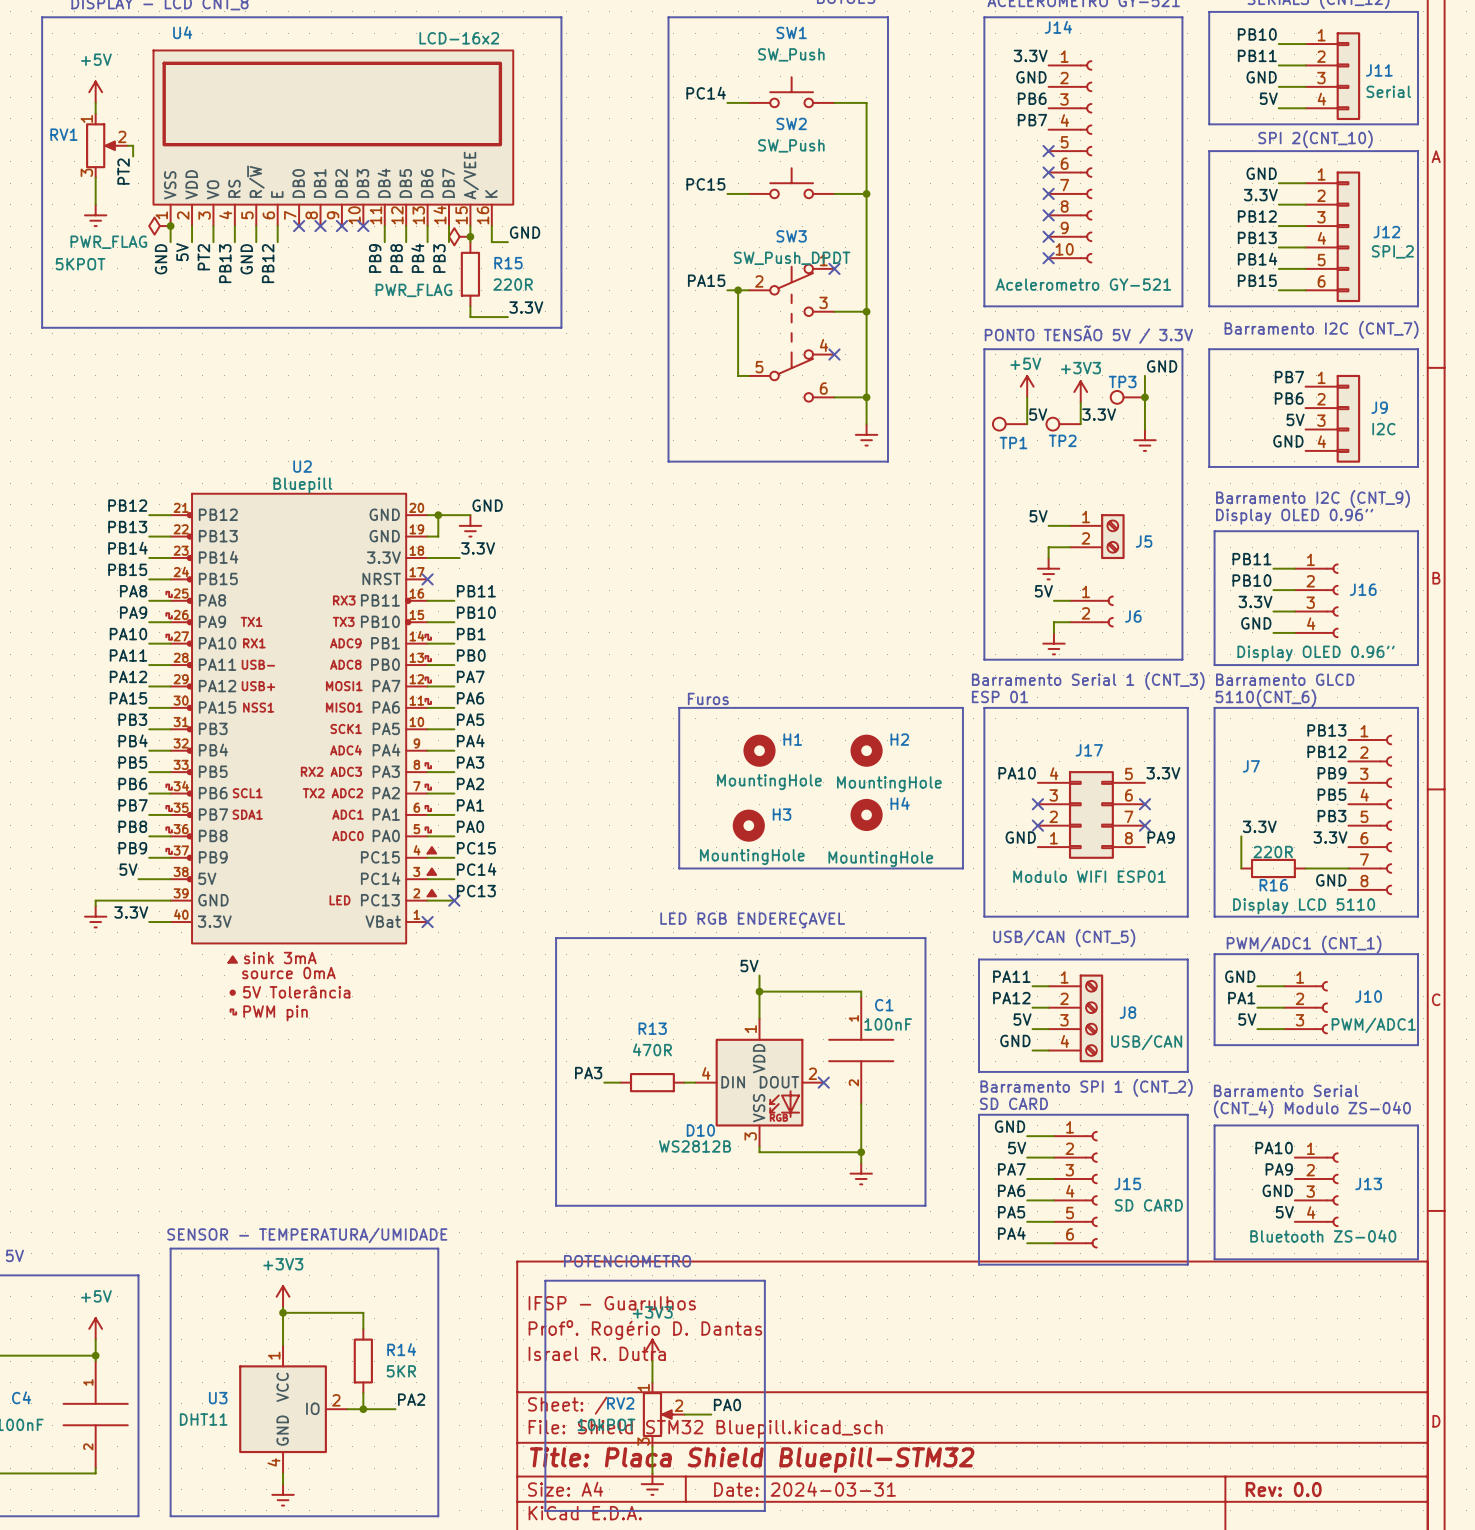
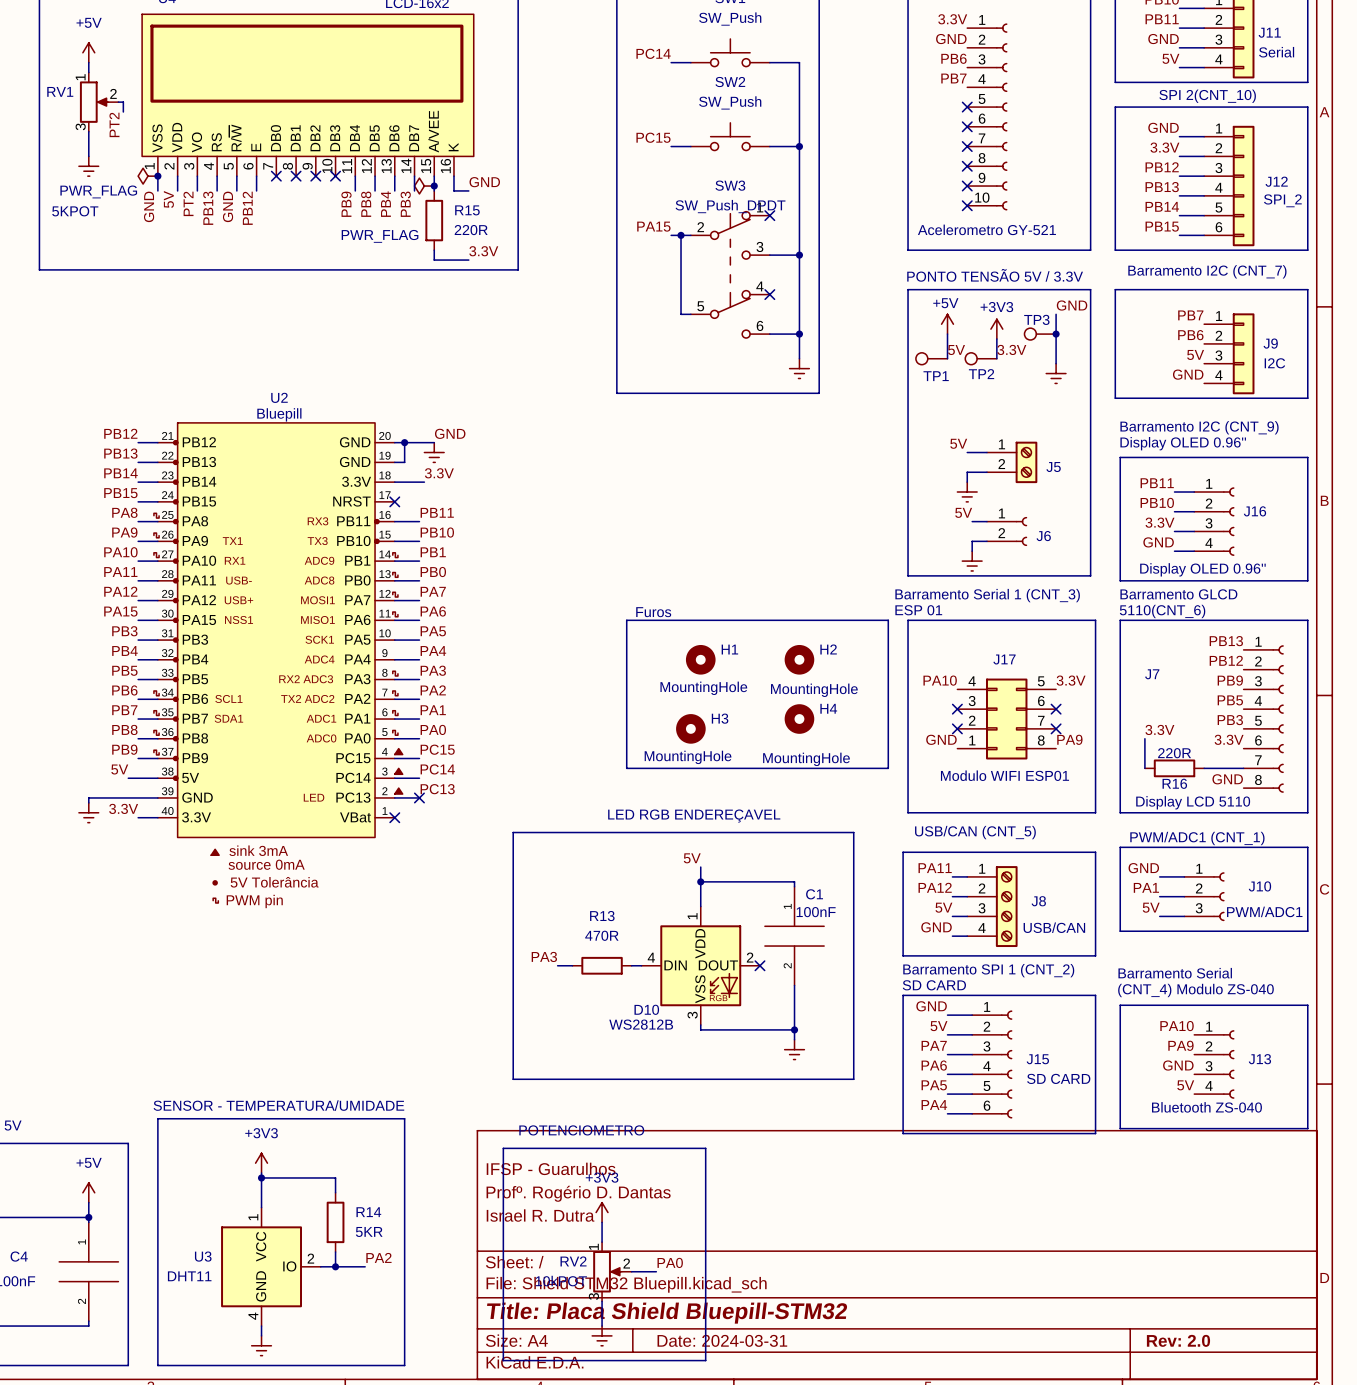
title block: Rev: 0.0 (1283, 1489) -> Rev: 2.0 (1178, 1340)

